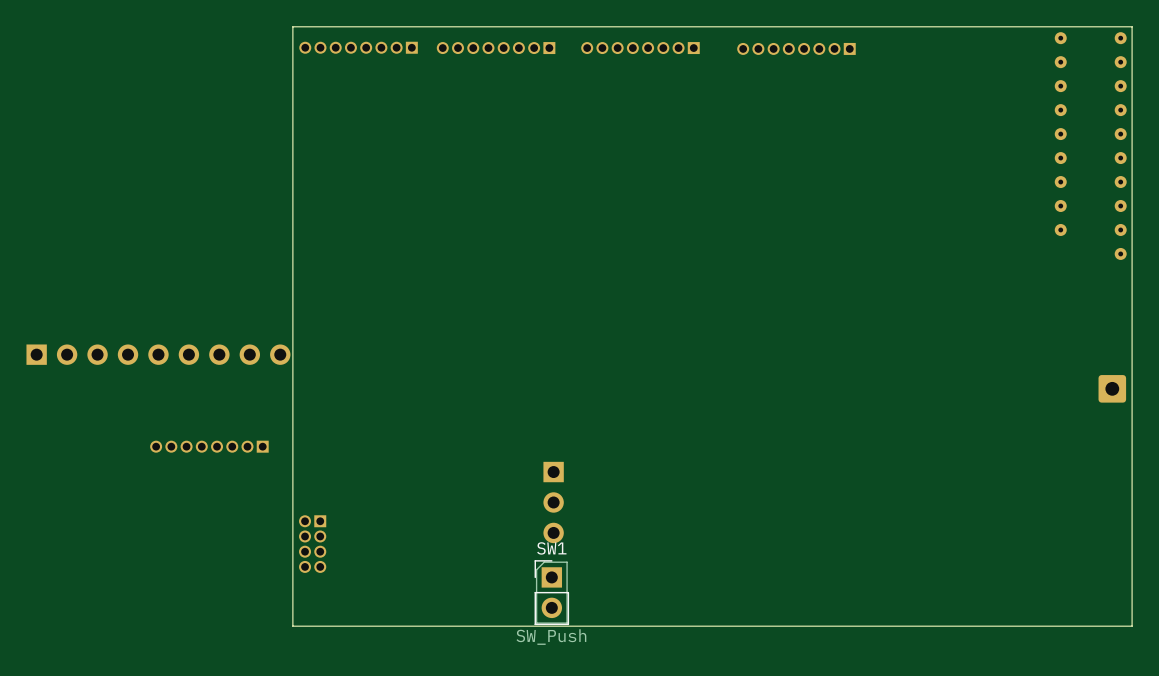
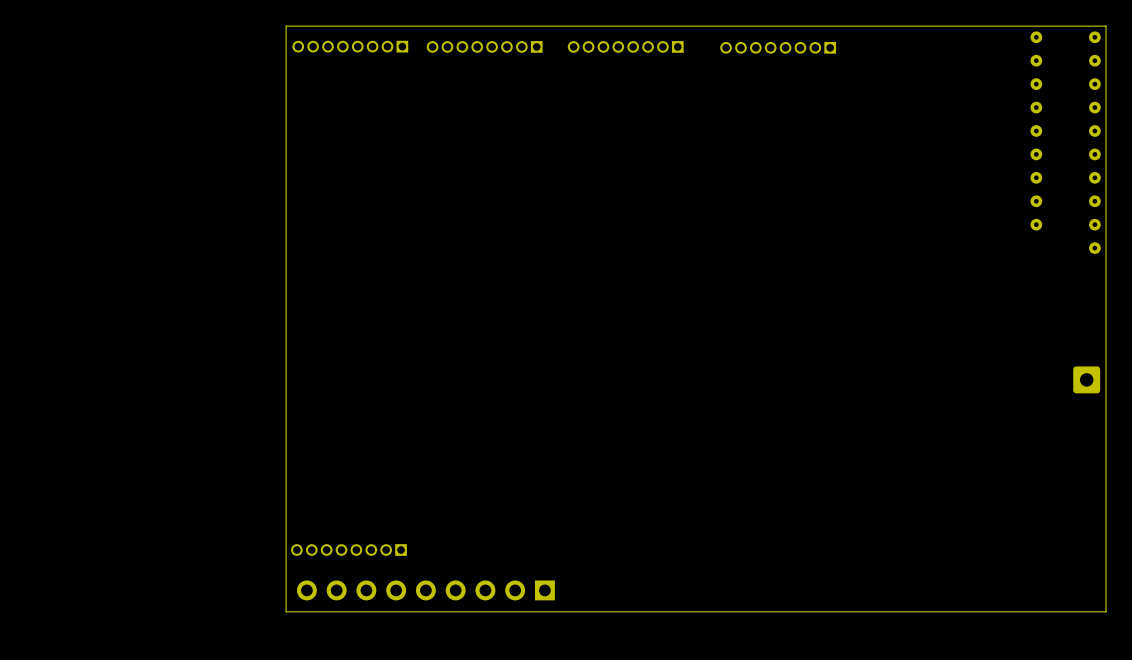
part: (158, 354) -> none
part position: (209, 446) -> (348, 550)
part: (553, 502) -> none
part: (312, 544) -> none
SW1: SW_Push (551, 592) -> none
part: none -> (425, 590)

